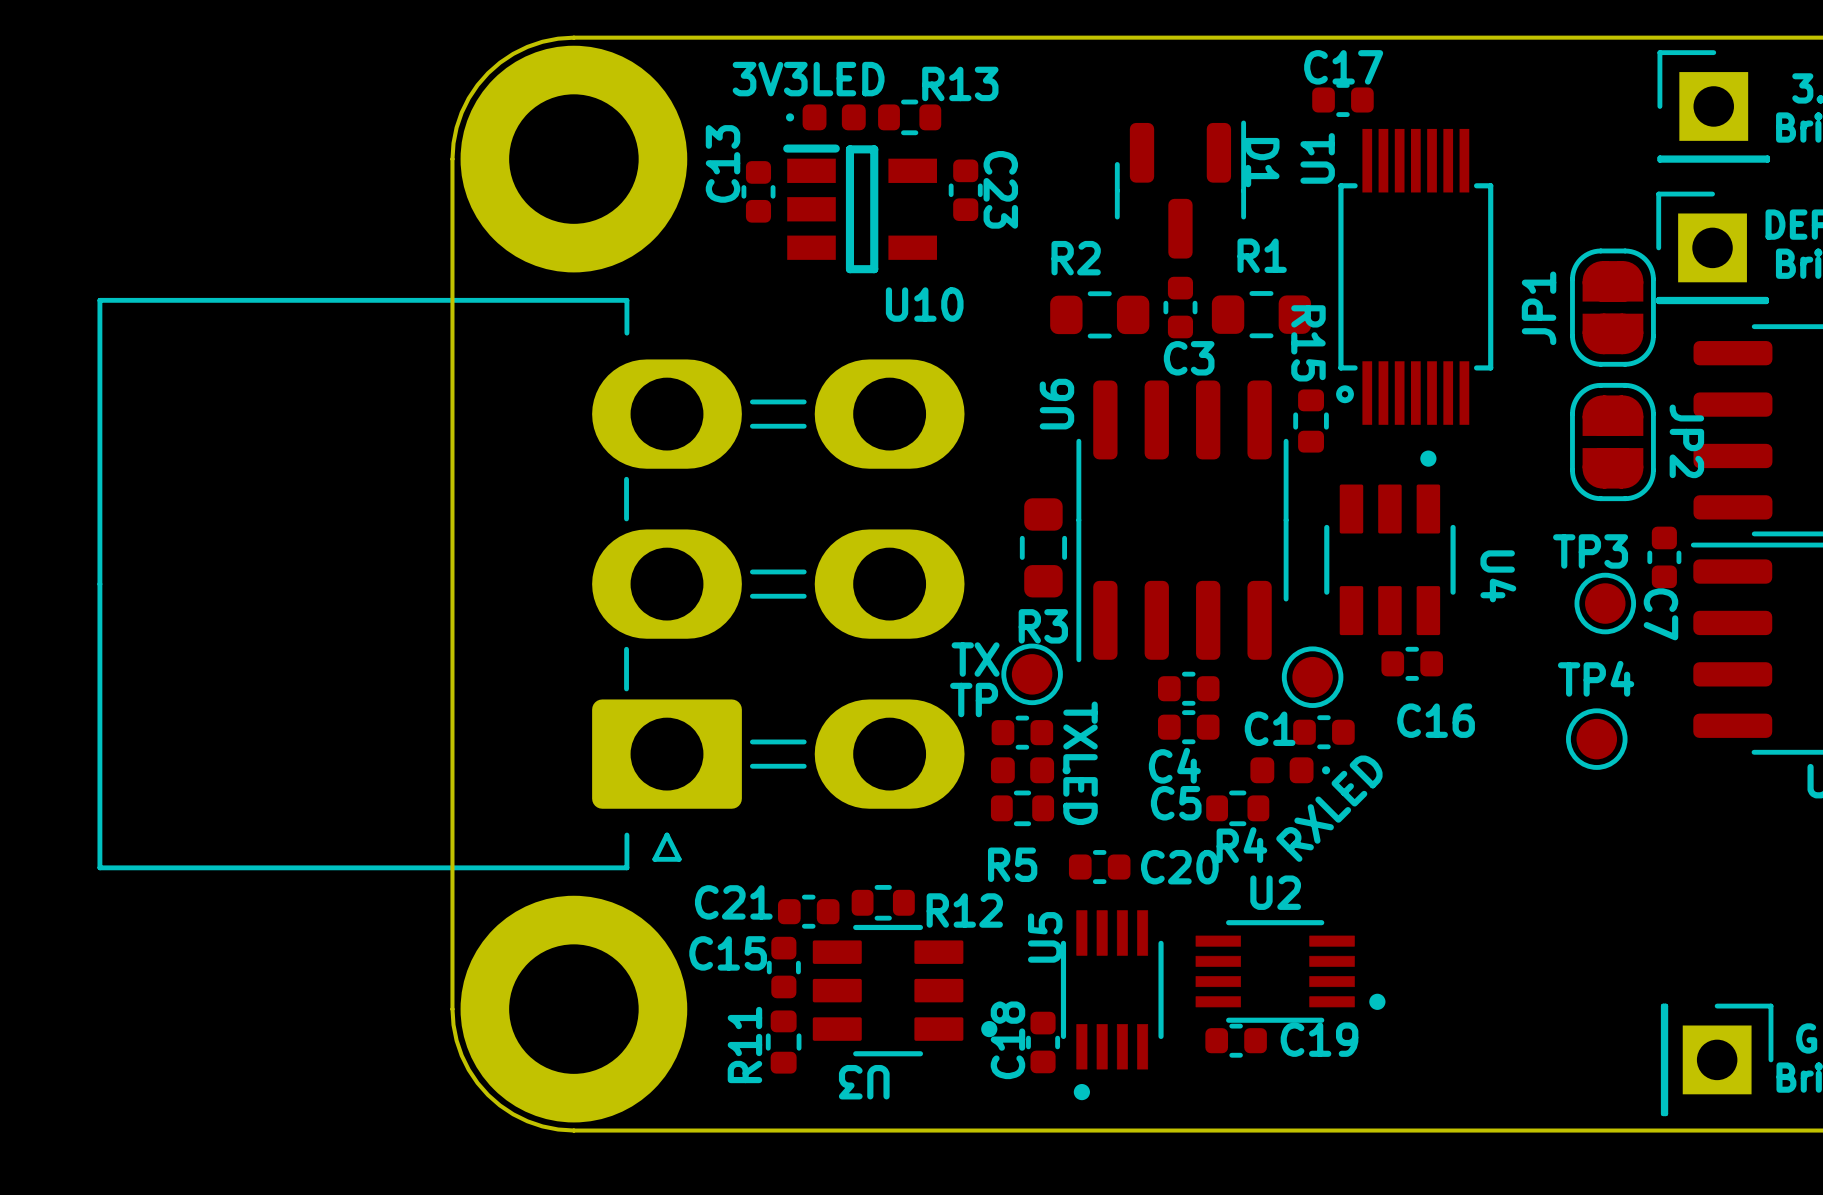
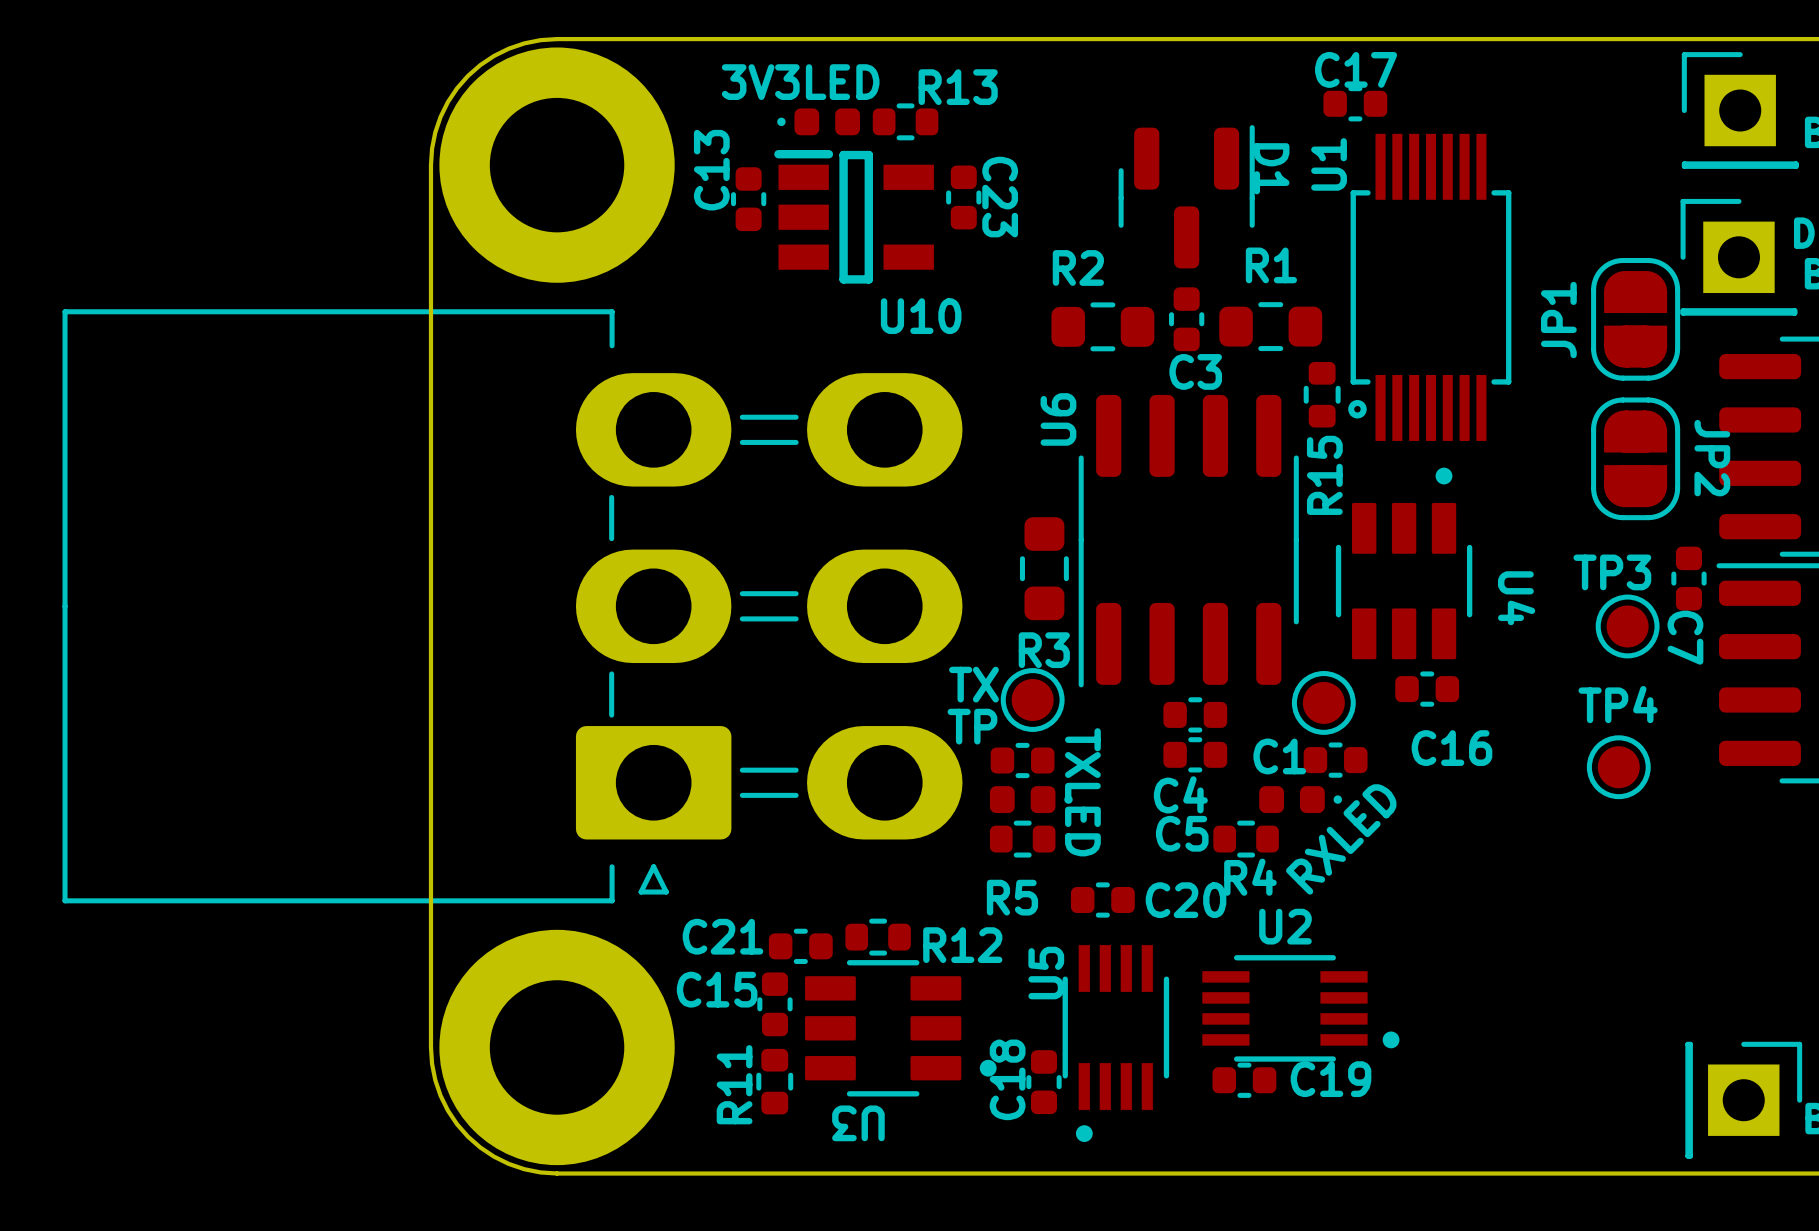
R15 name rotation: 0° (1308, 343) -> 180° (1324, 475)
R15 name position: R15 (1308, 343) -> R15 (1324, 475)
R15 position: (1311, 421) -> (1322, 394)

